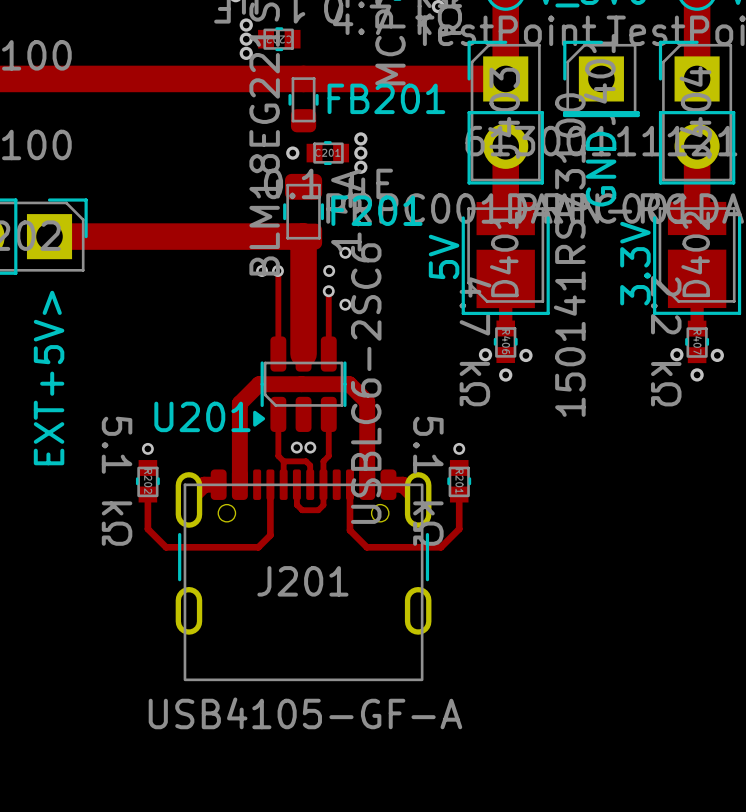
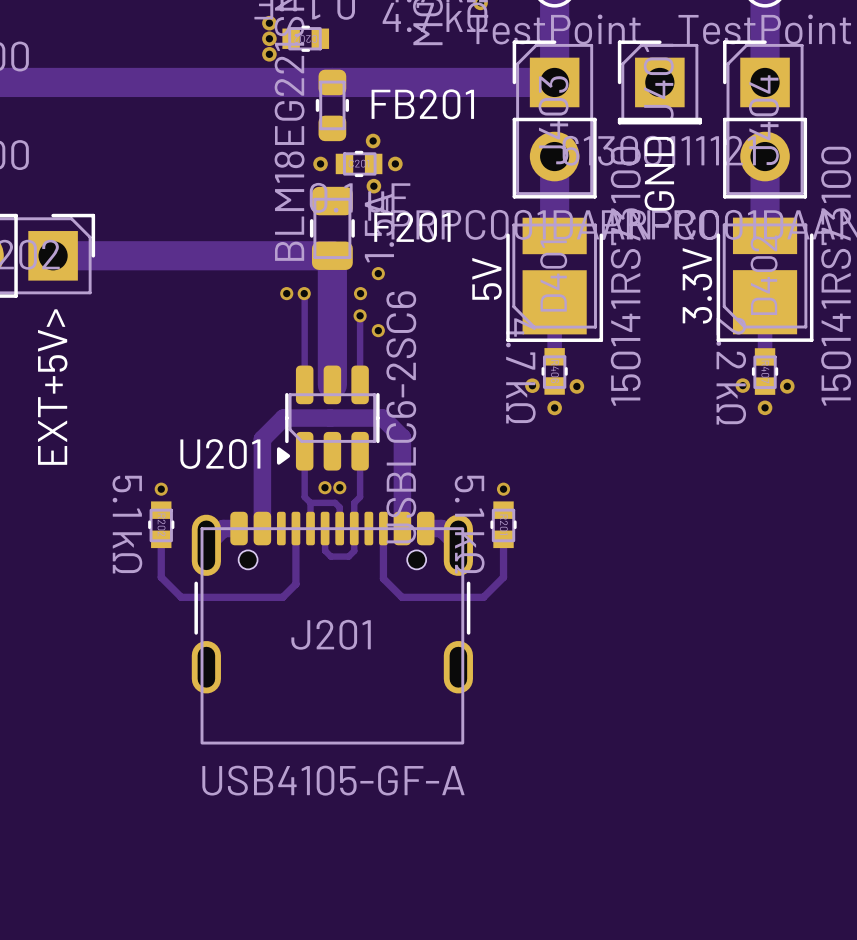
via: none -> (373, 140)
via: (360, 138) -> none
via: (360, 167) -> none
via: none -> (373, 186)

